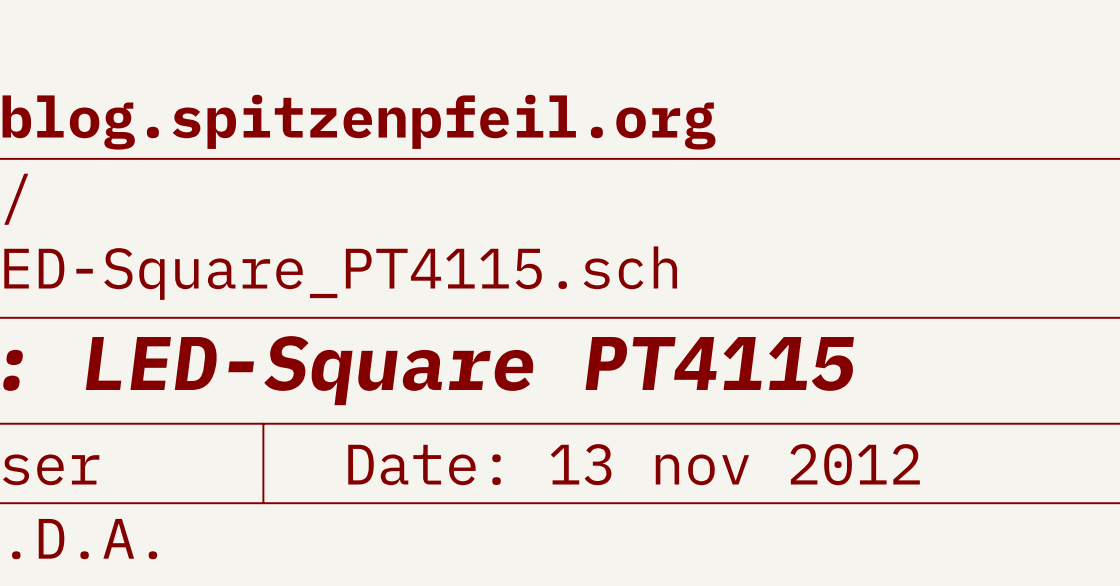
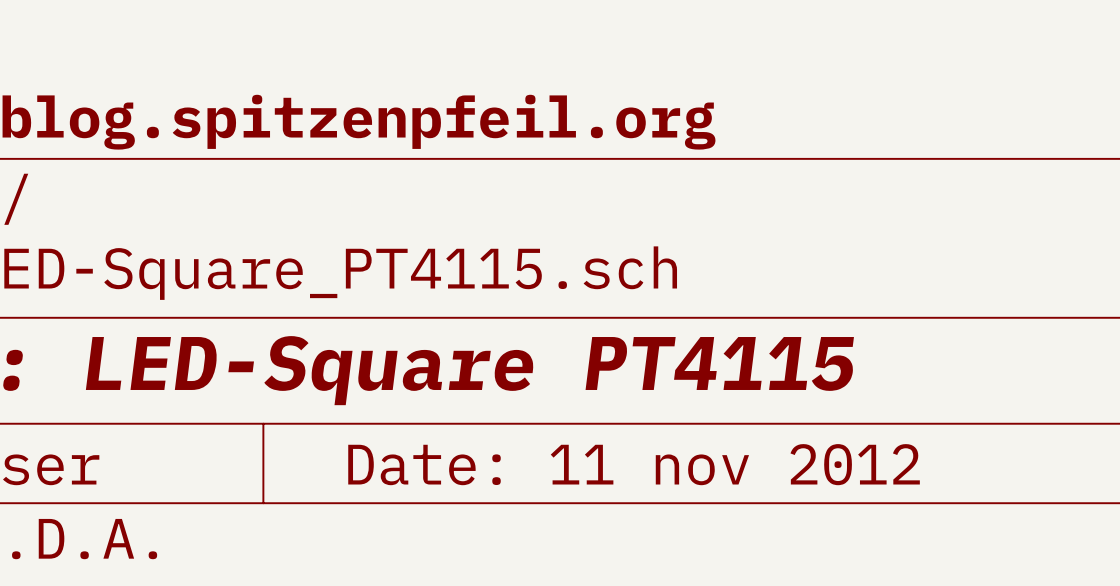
title block: Date: 13 nov 2012 (634, 464) -> Date: 11 nov 2012 (634, 464)

